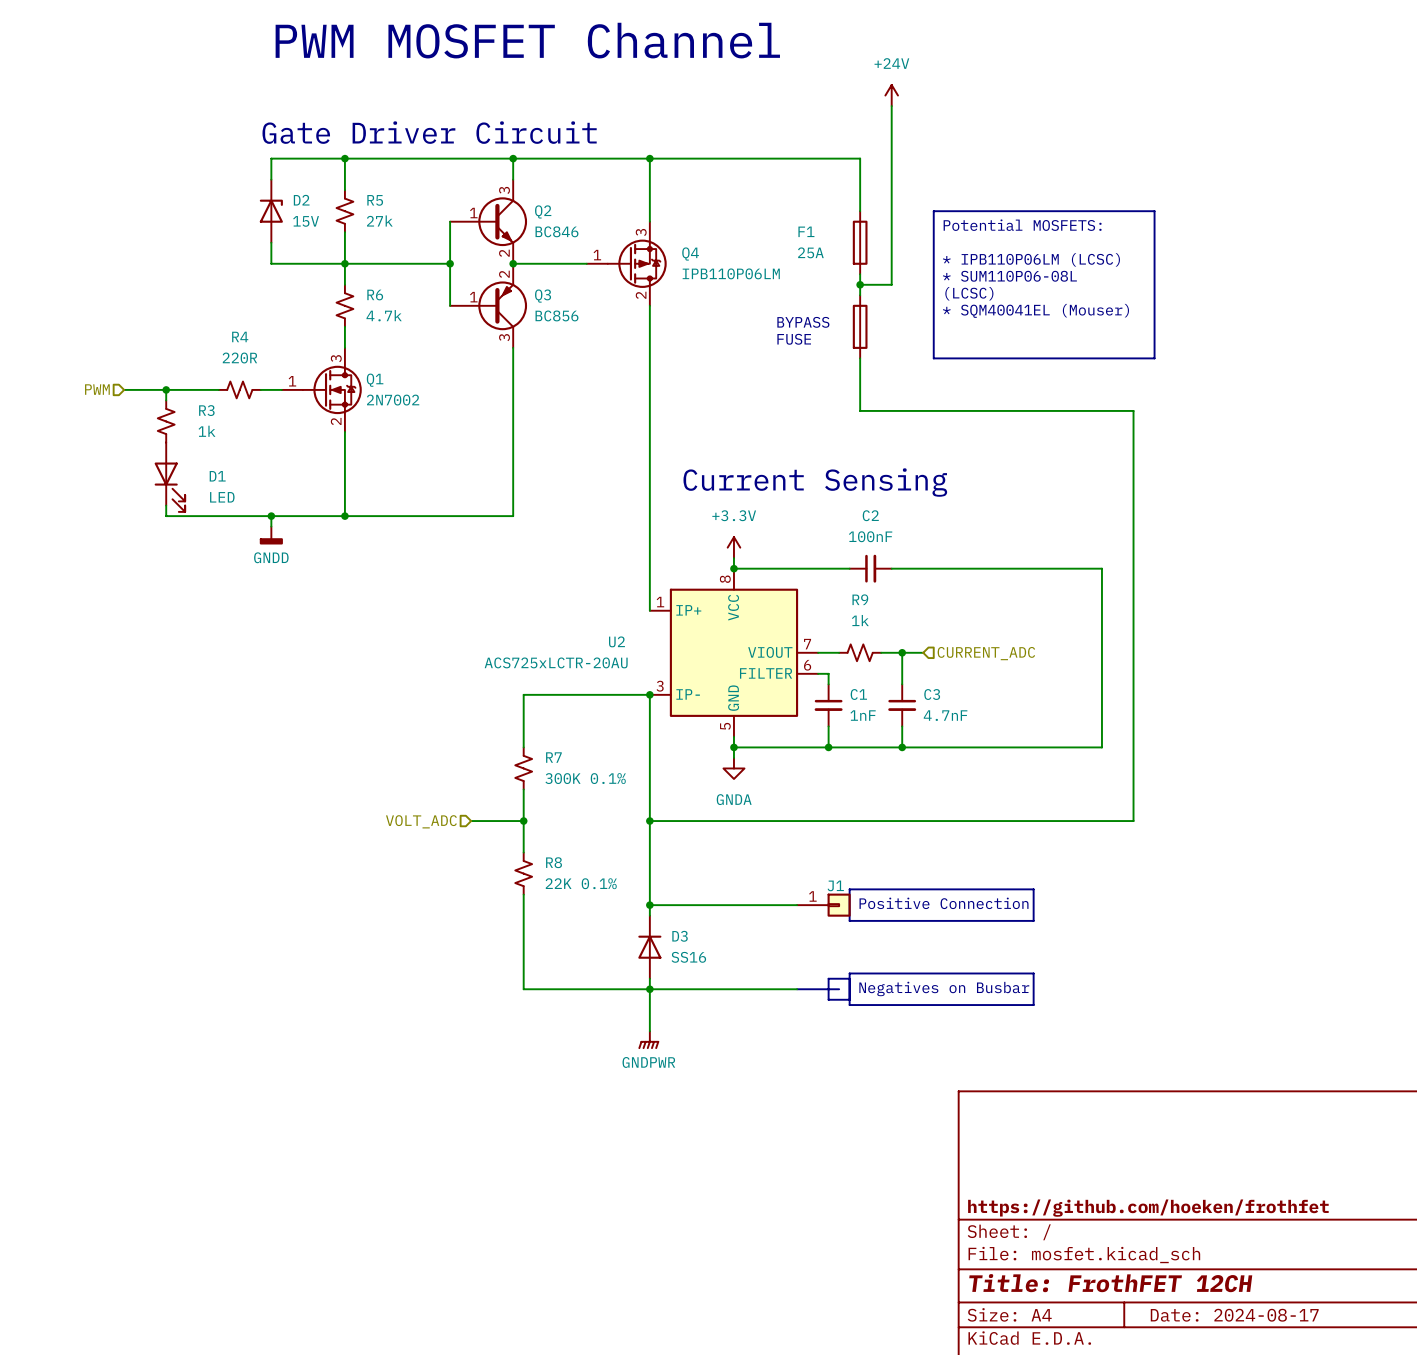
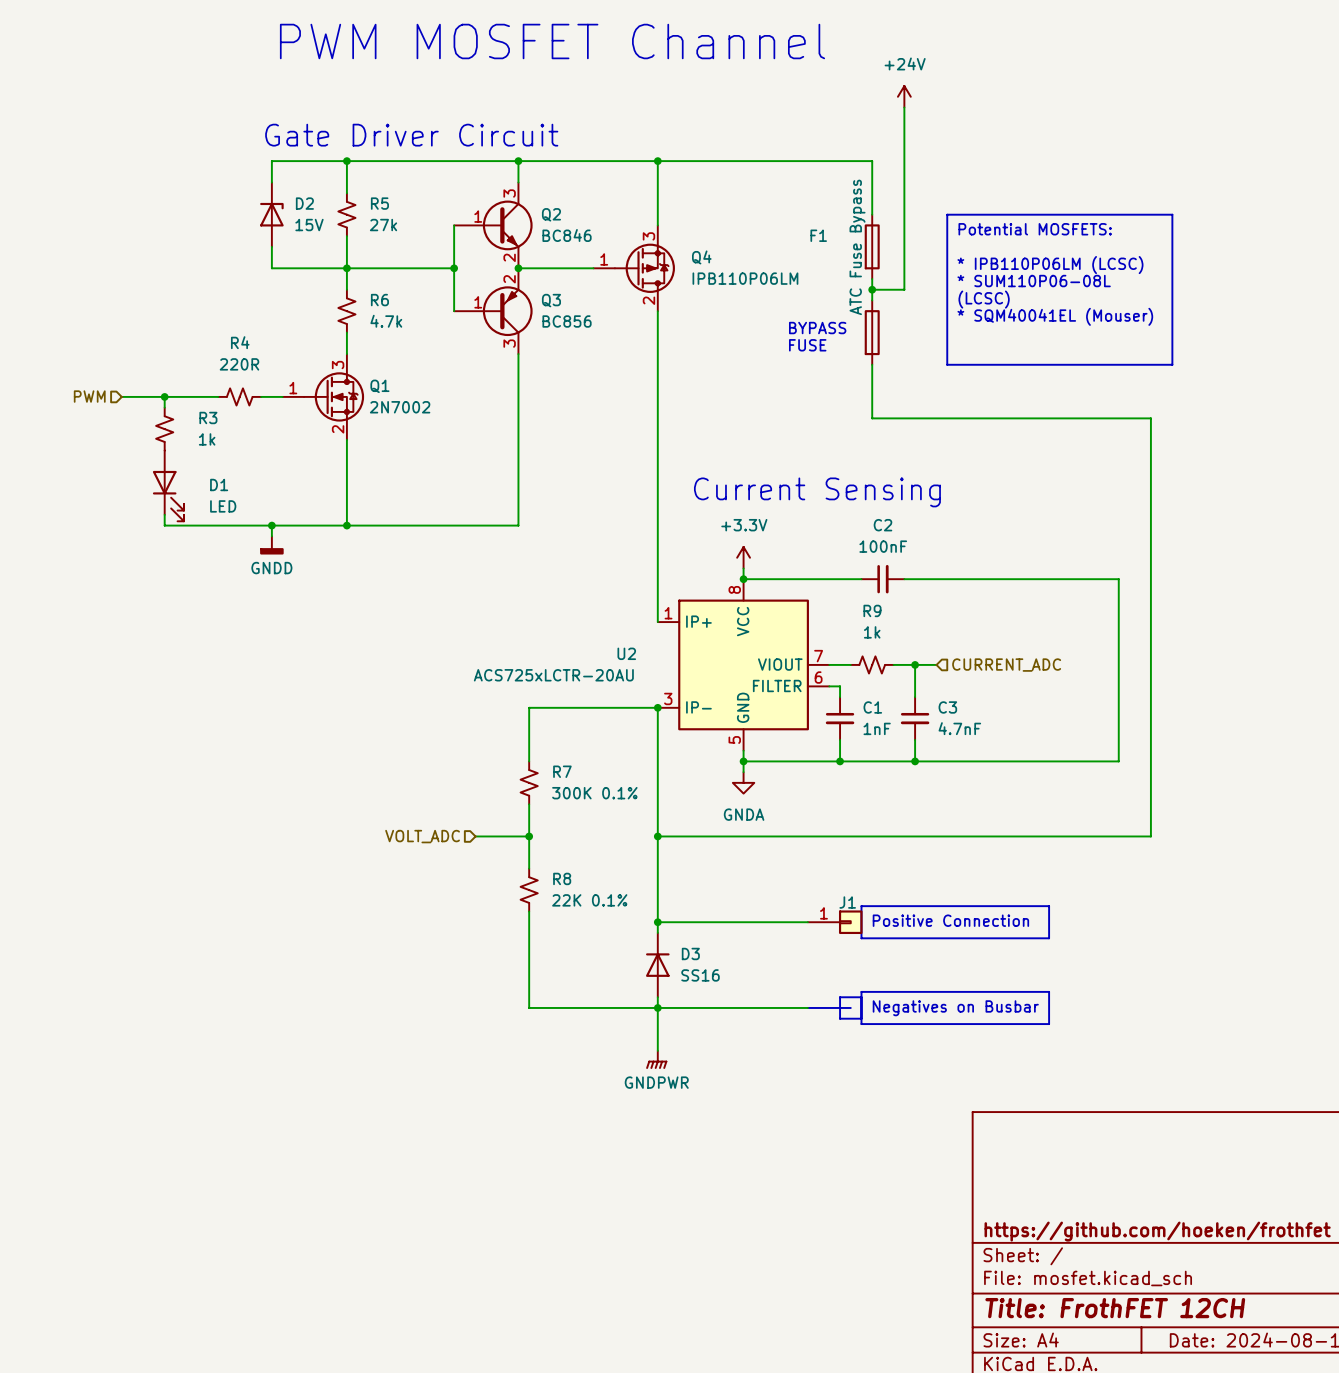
F1 value: 25A (810, 252) -> ATC Fuse Bypass (857, 247)

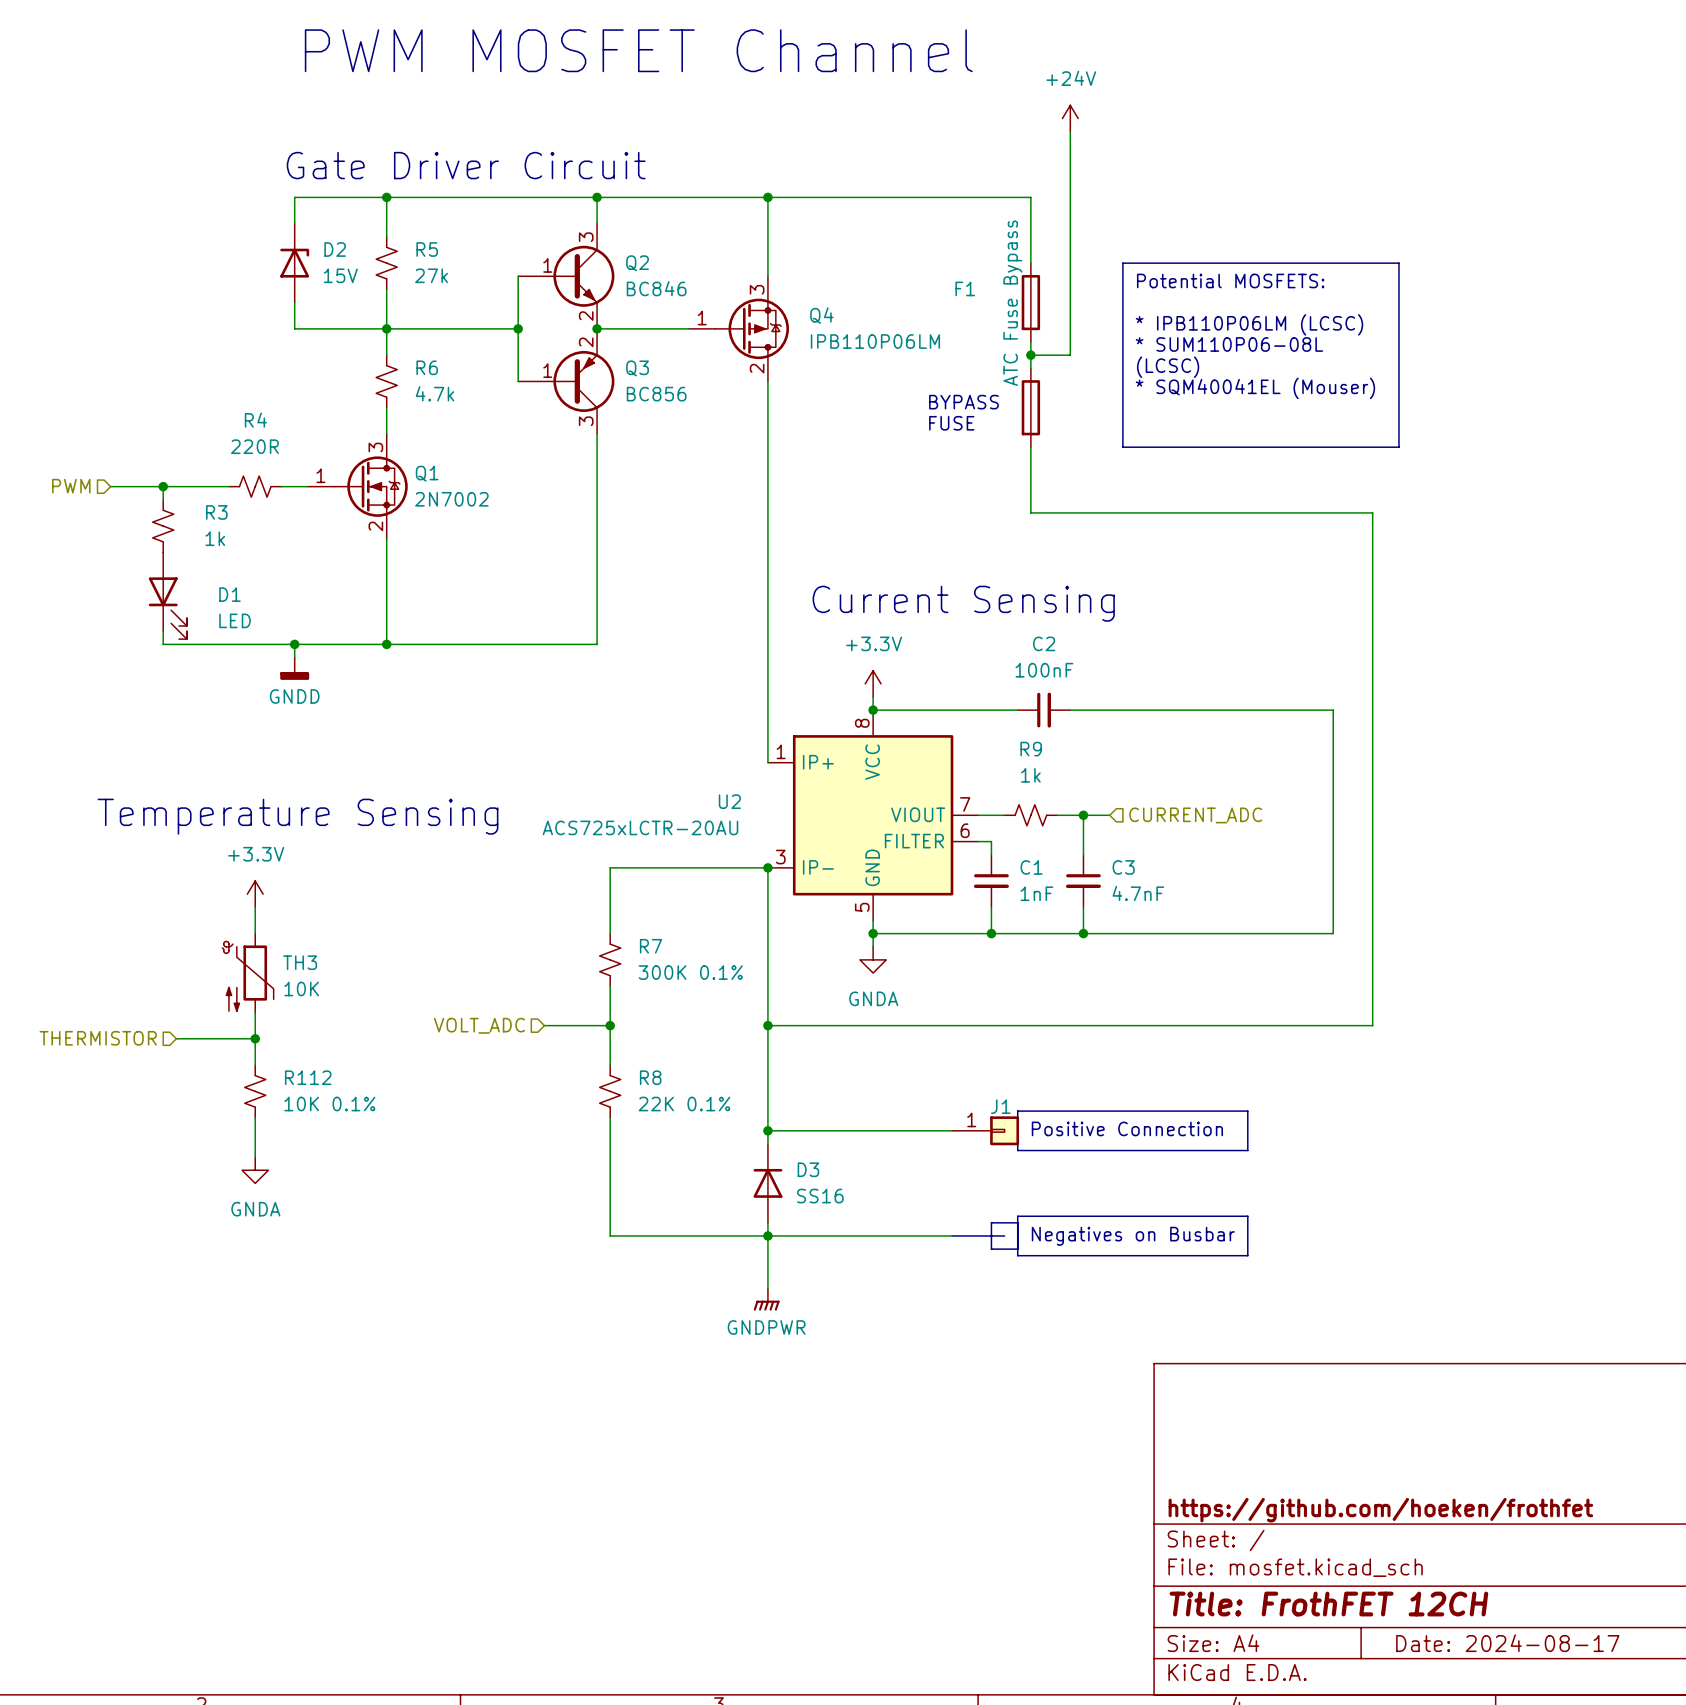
text: none -> Temperature Sensing (298, 816)
power symbol: none -> +3.3V (255, 894)
wire: none -> (255, 907) (255, 933)
TH3: none -> 10K (248, 973)
wire: none -> (255, 1012) (255, 1065)
hierarchical label: none -> THERMISTOR (98, 1038)
wire: none -> (176, 1038) (255, 1038)
junction: none -> (255, 1038)
R112: none -> 10K 0.1% (255, 1091)
wire: none -> (255, 1117) (255, 1157)
power symbol: none -> GNDA (255, 1170)

